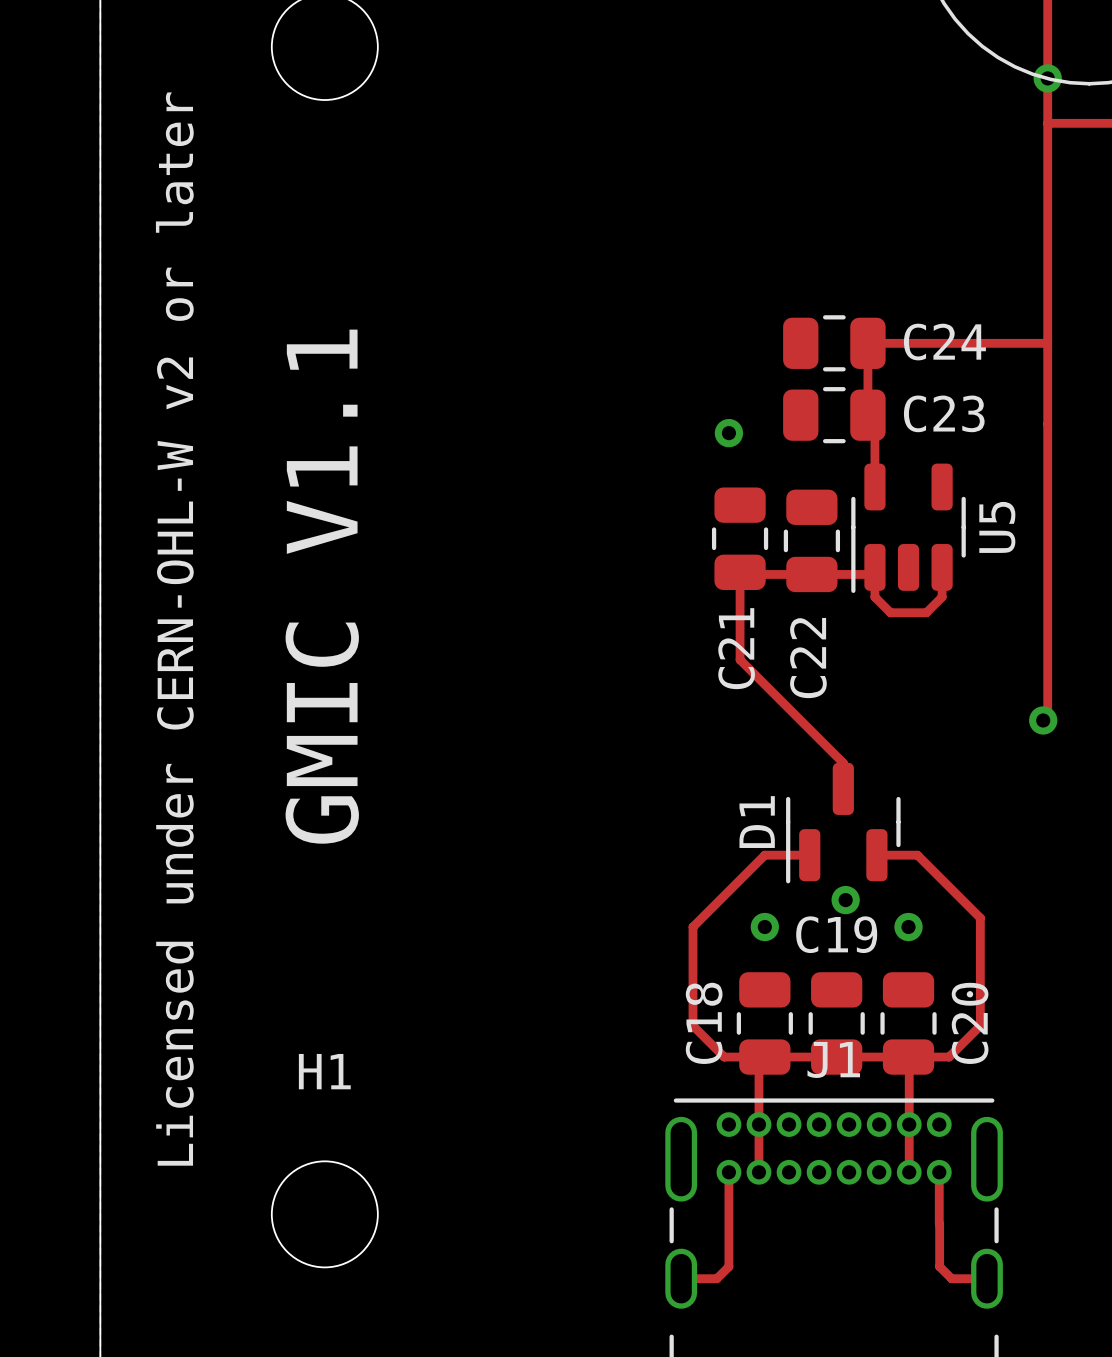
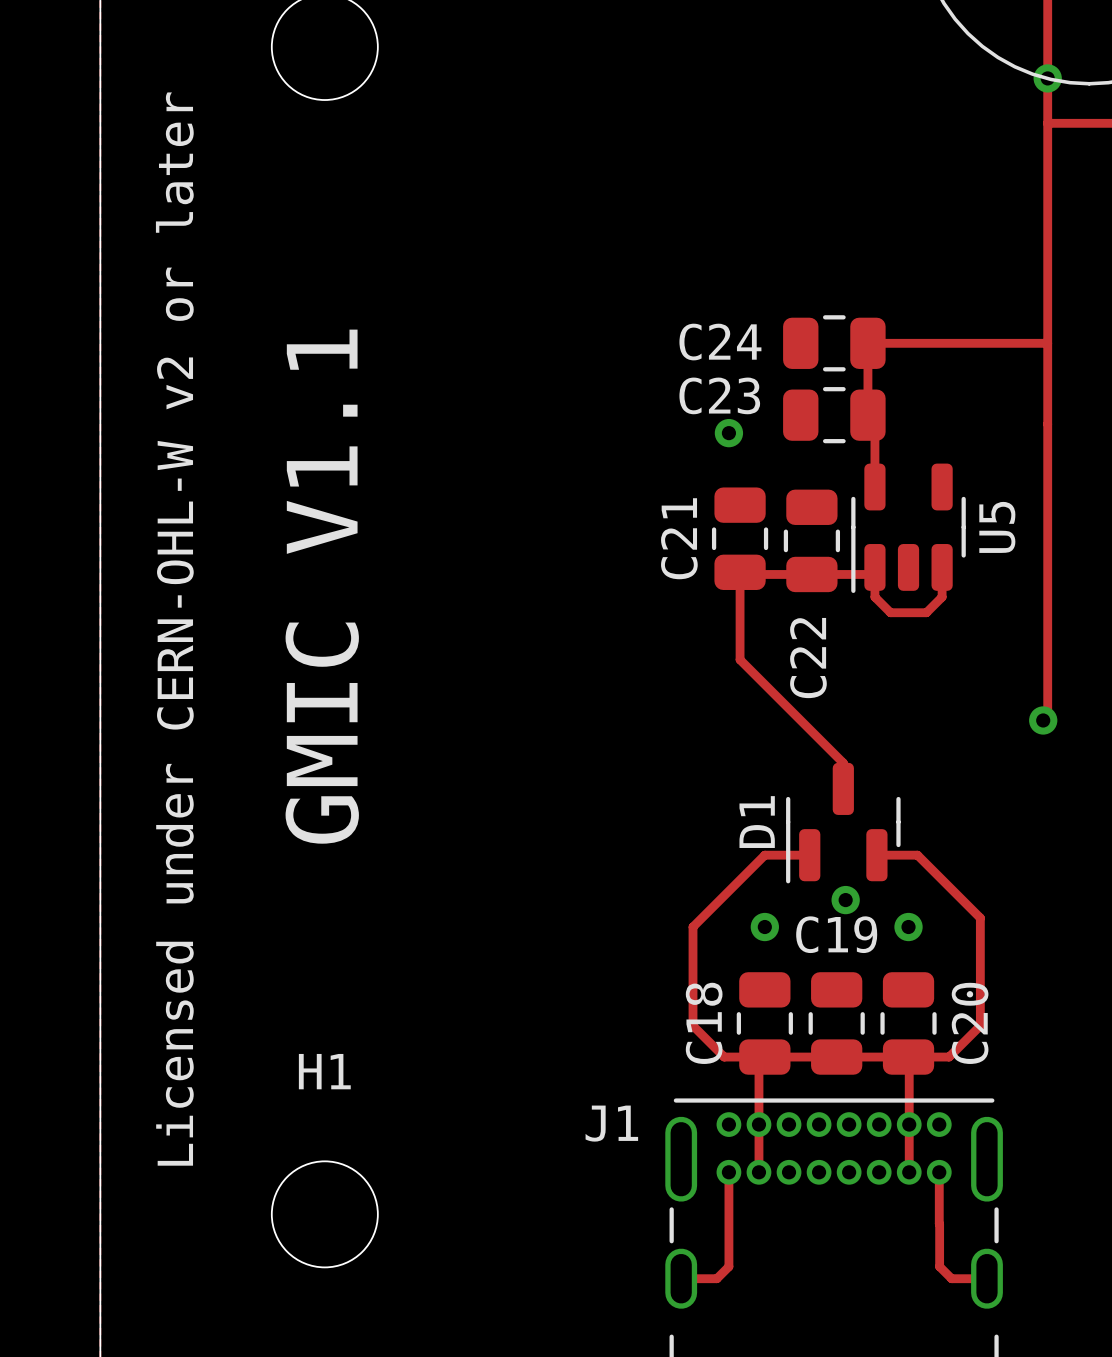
C24 name position: C24 (944, 342) -> C24 (720, 342)
C23 name position: C23 (944, 413) -> C23 (719, 395)
C21 name position: C21 (736, 648) -> C21 (679, 538)
J1 name position: J1 (833, 1059) -> J1 (611, 1123)

